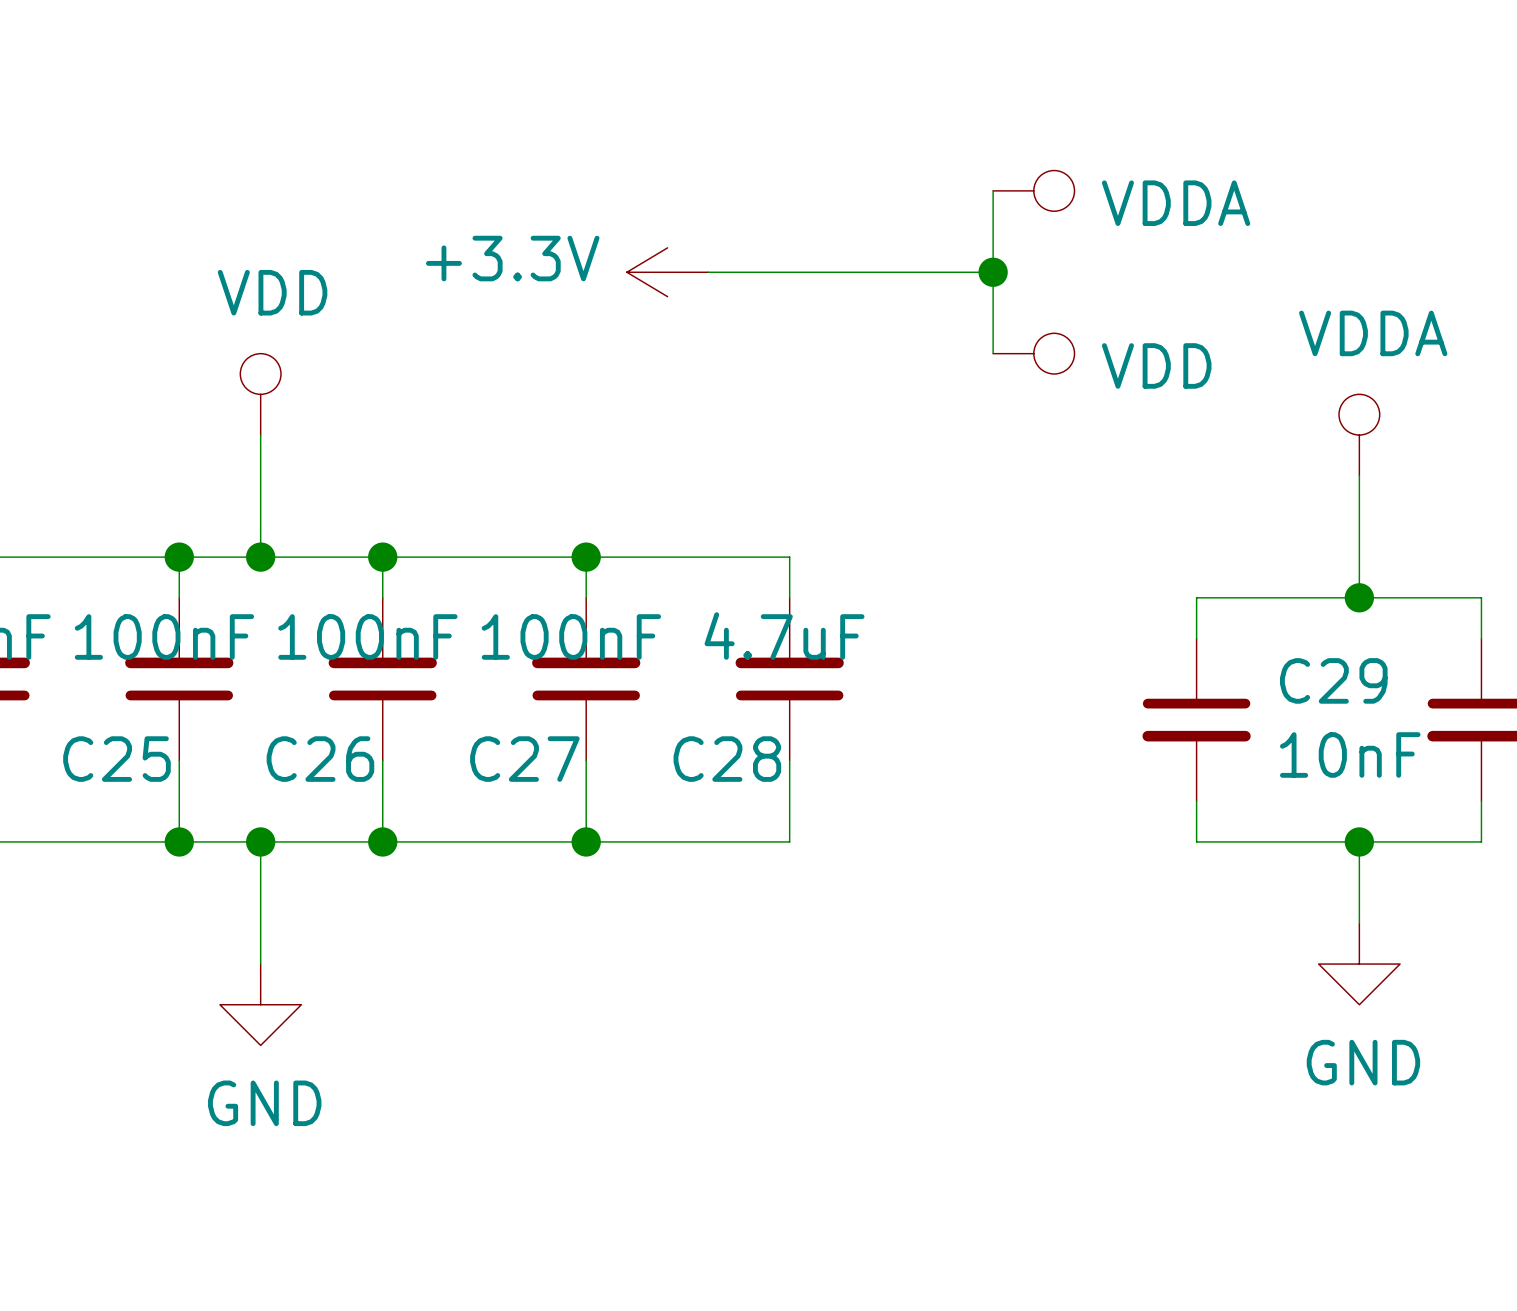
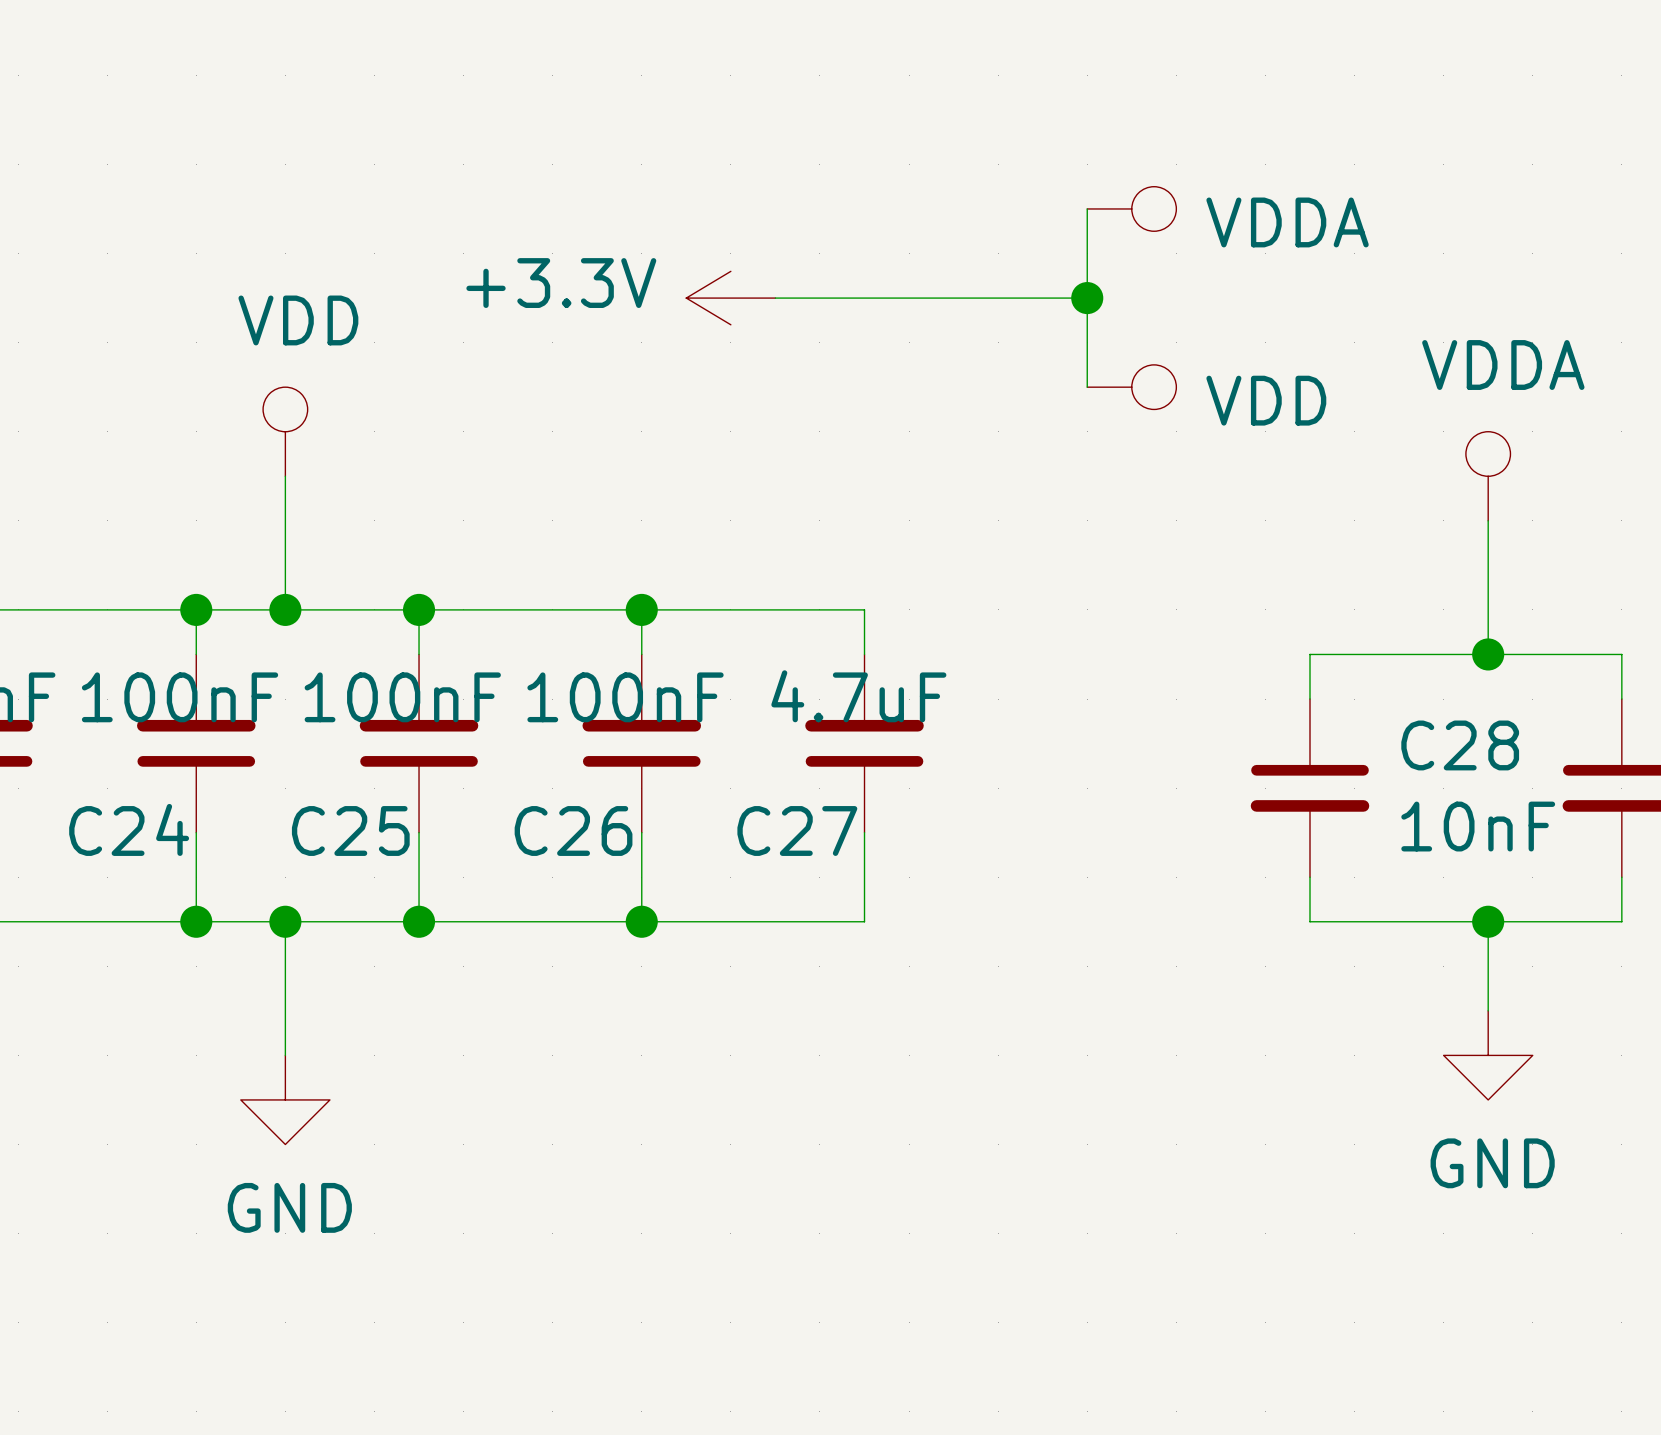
C29 name: C29 (1333, 680) -> C28 (1460, 745)
C25 name: C25 (116, 759) -> C24 (129, 829)
C26 name: C26 (320, 759) -> C25 (350, 830)
C27 name: C27 (524, 759) -> C26 (573, 830)
C28 name: C28 (727, 759) -> C27 (797, 830)

